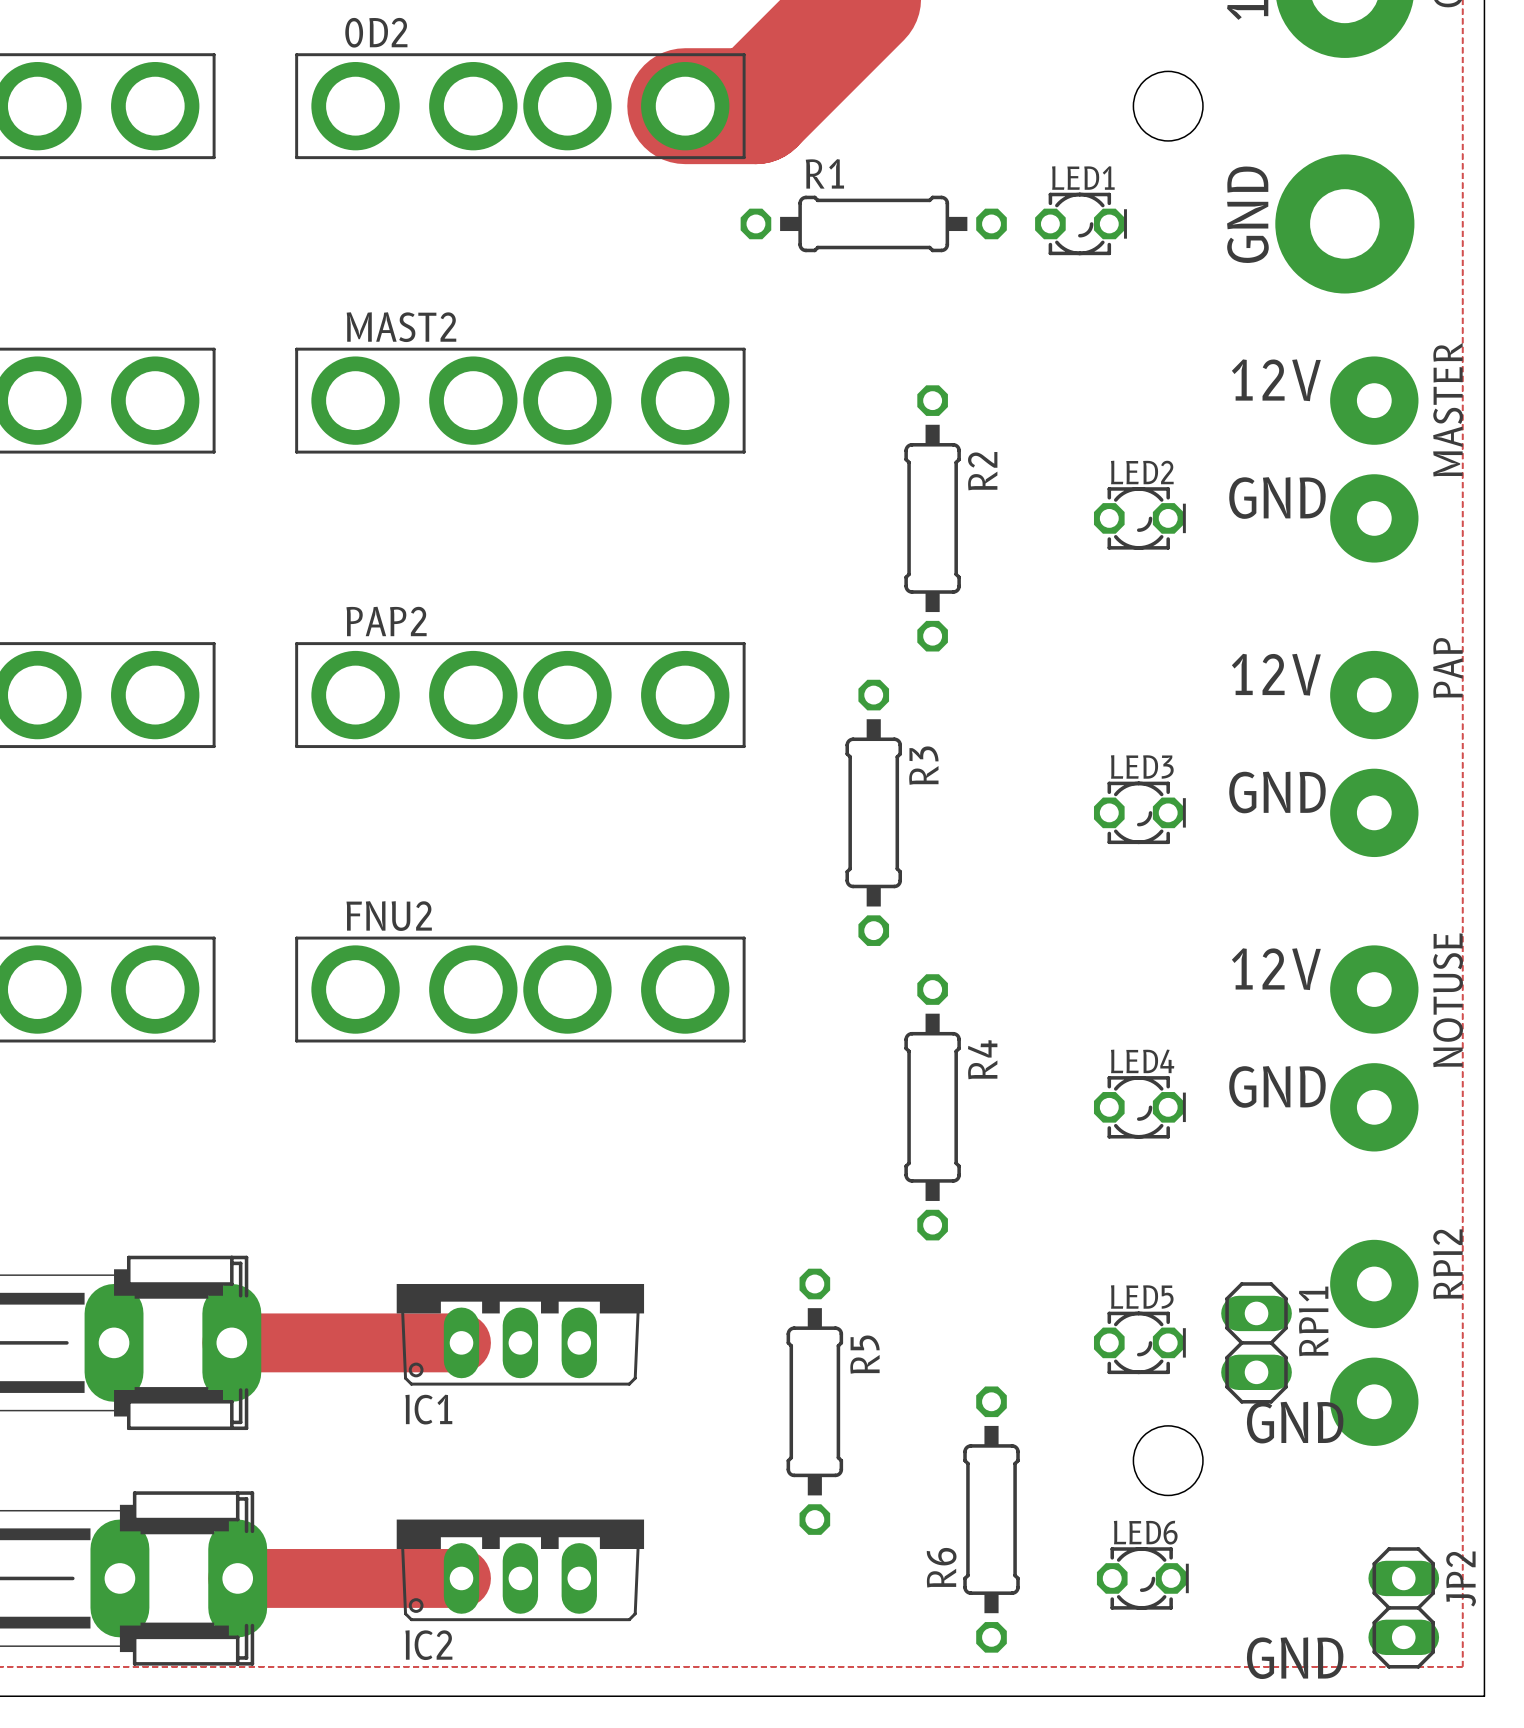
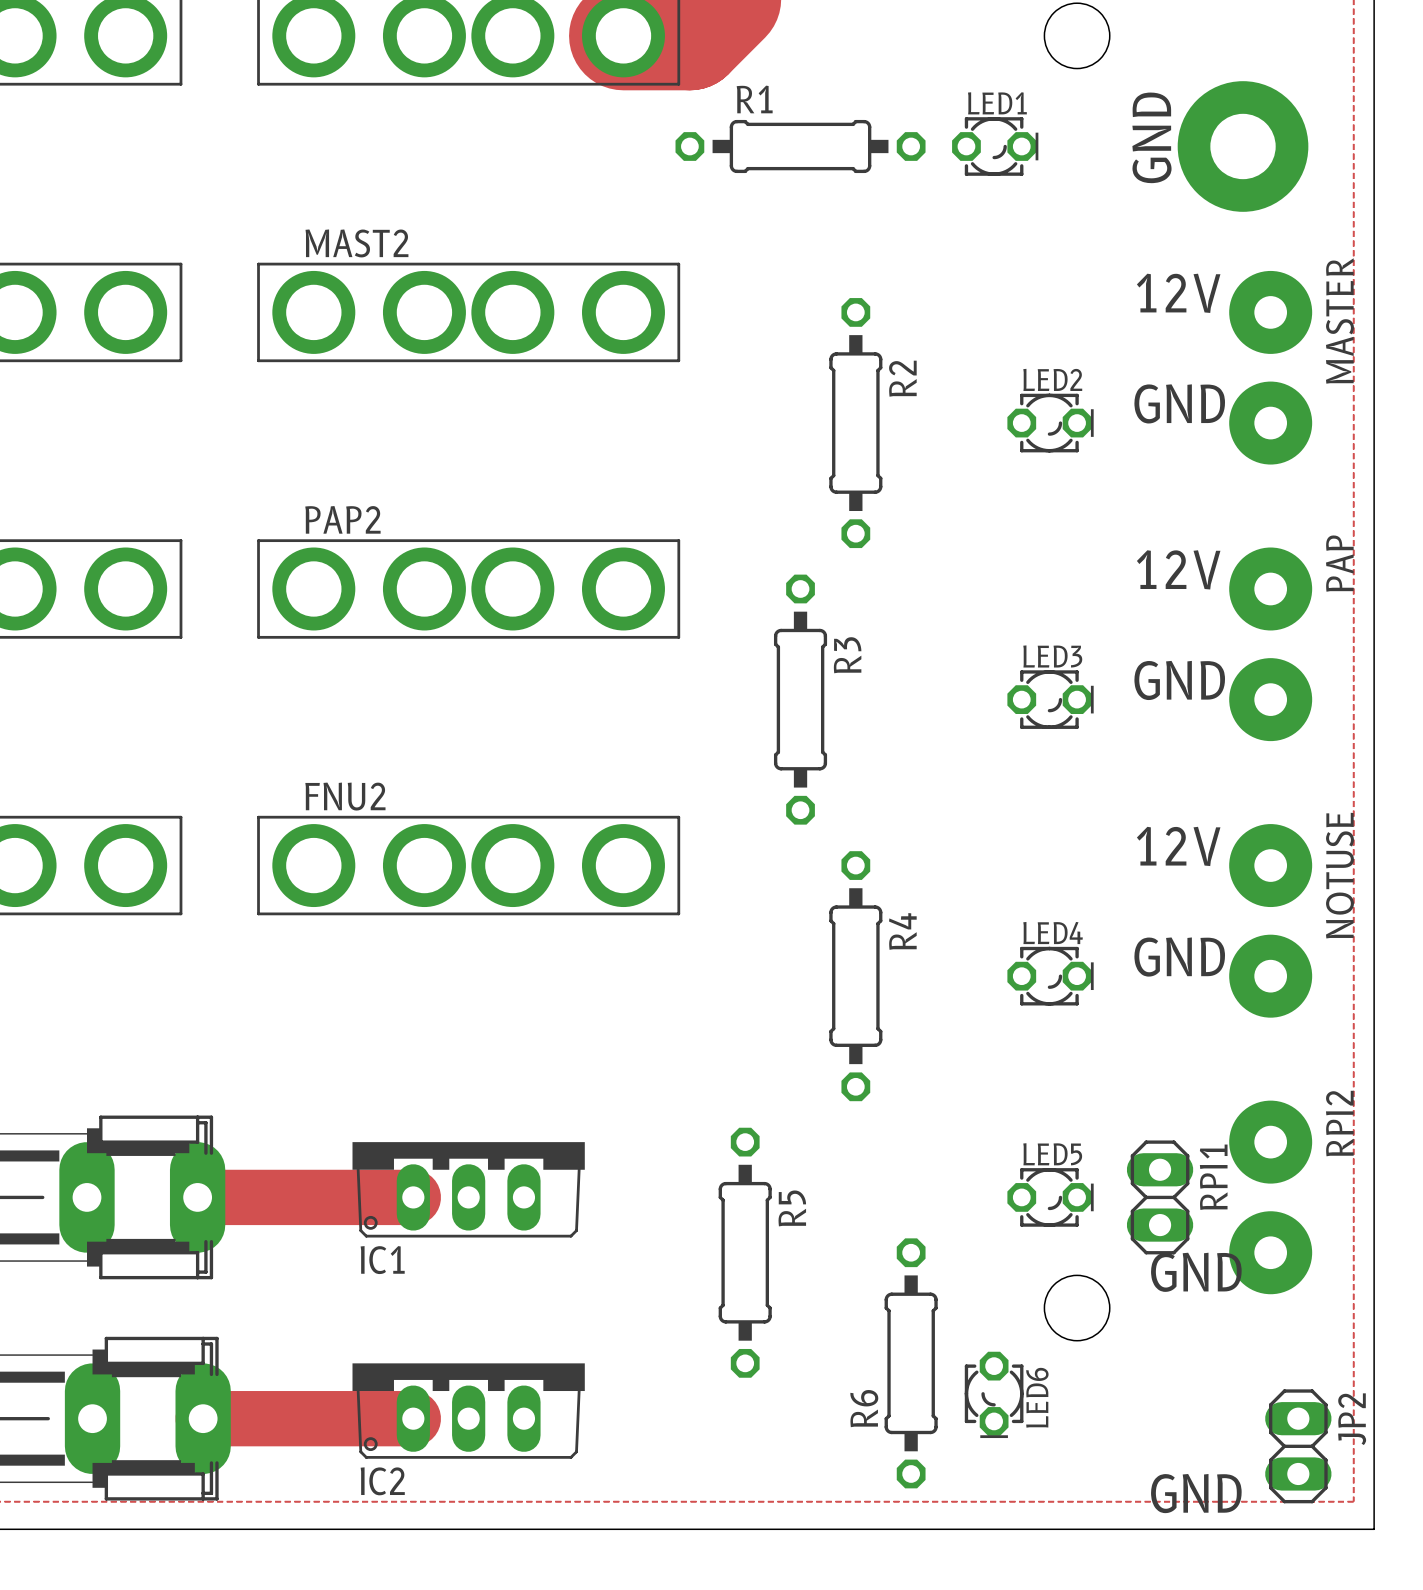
LED6 rotation: 0° (1142, 1578) -> 90° clockwise (994, 1394)
LED6 position: (1142, 1578) -> (994, 1394)

